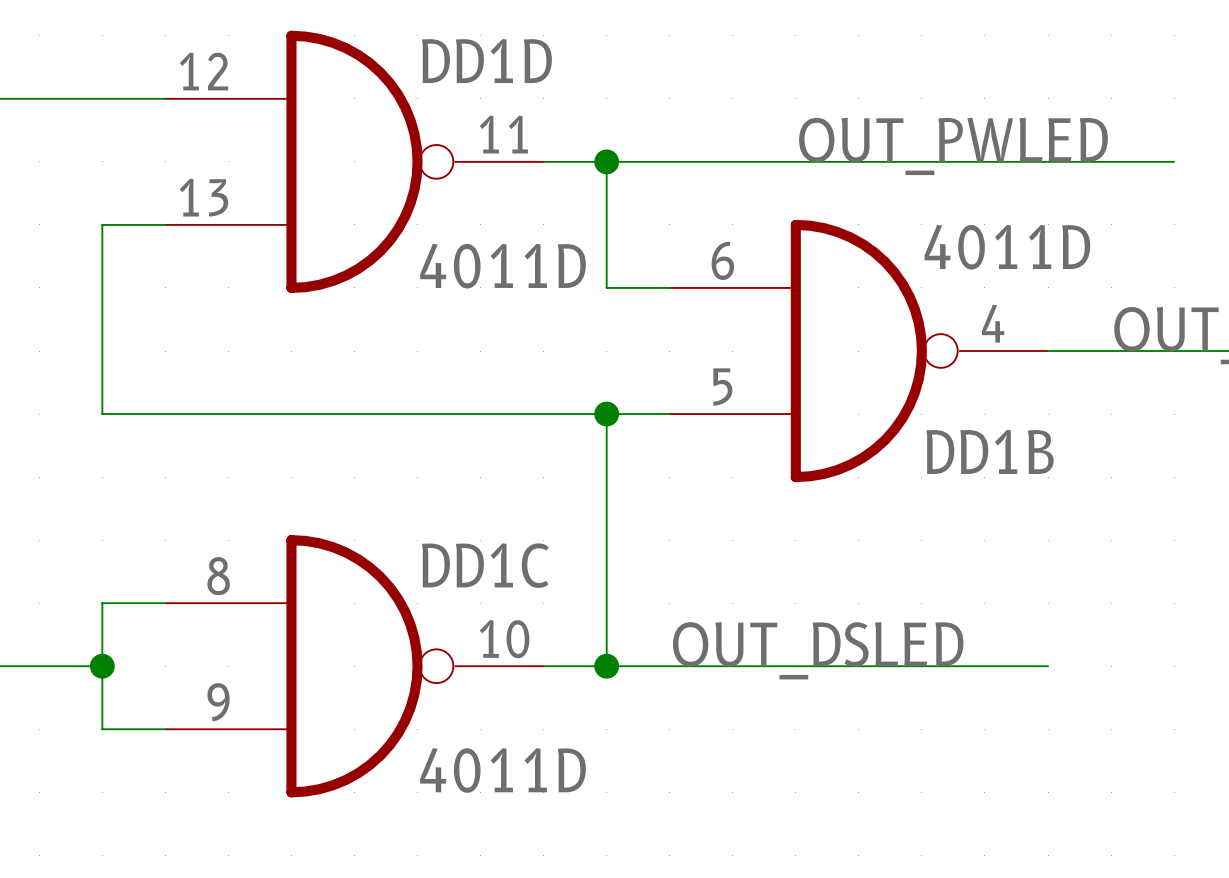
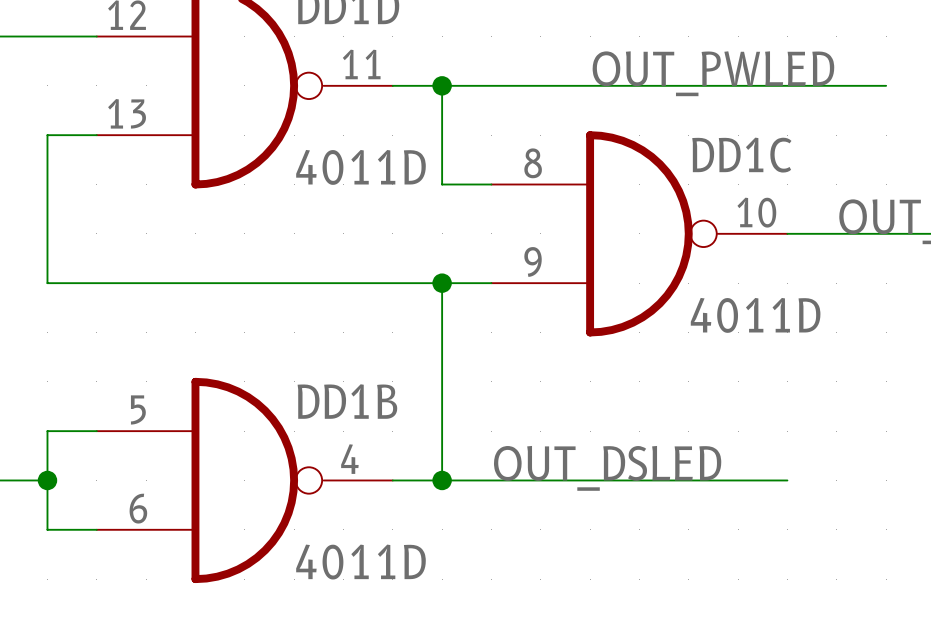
DD1B flip: as is (858, 351) -> up-down (244, 480)
DD1B position: (858, 351) -> (244, 480)
DD1C position: (354, 666) -> (639, 233)

